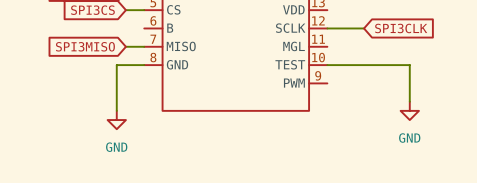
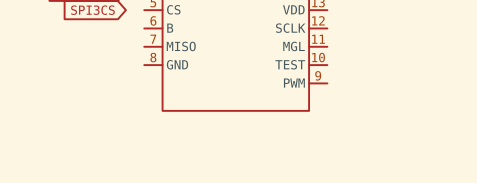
wire: (125, 10) (144, 10) -> none
wire: (327, 28) (364, 28) -> none
global label: SPI3CLK (401, 28) -> none
global label: SPI3MISO (85, 46) -> none
wire: (125, 46) (144, 46) -> none
wire: (144, 65) (116, 65) (116, 110) -> none
wire: (327, 65) (409, 65) (409, 101) -> none
power symbol: GND (409, 110) -> none
power symbol: GND (116, 120) -> none

